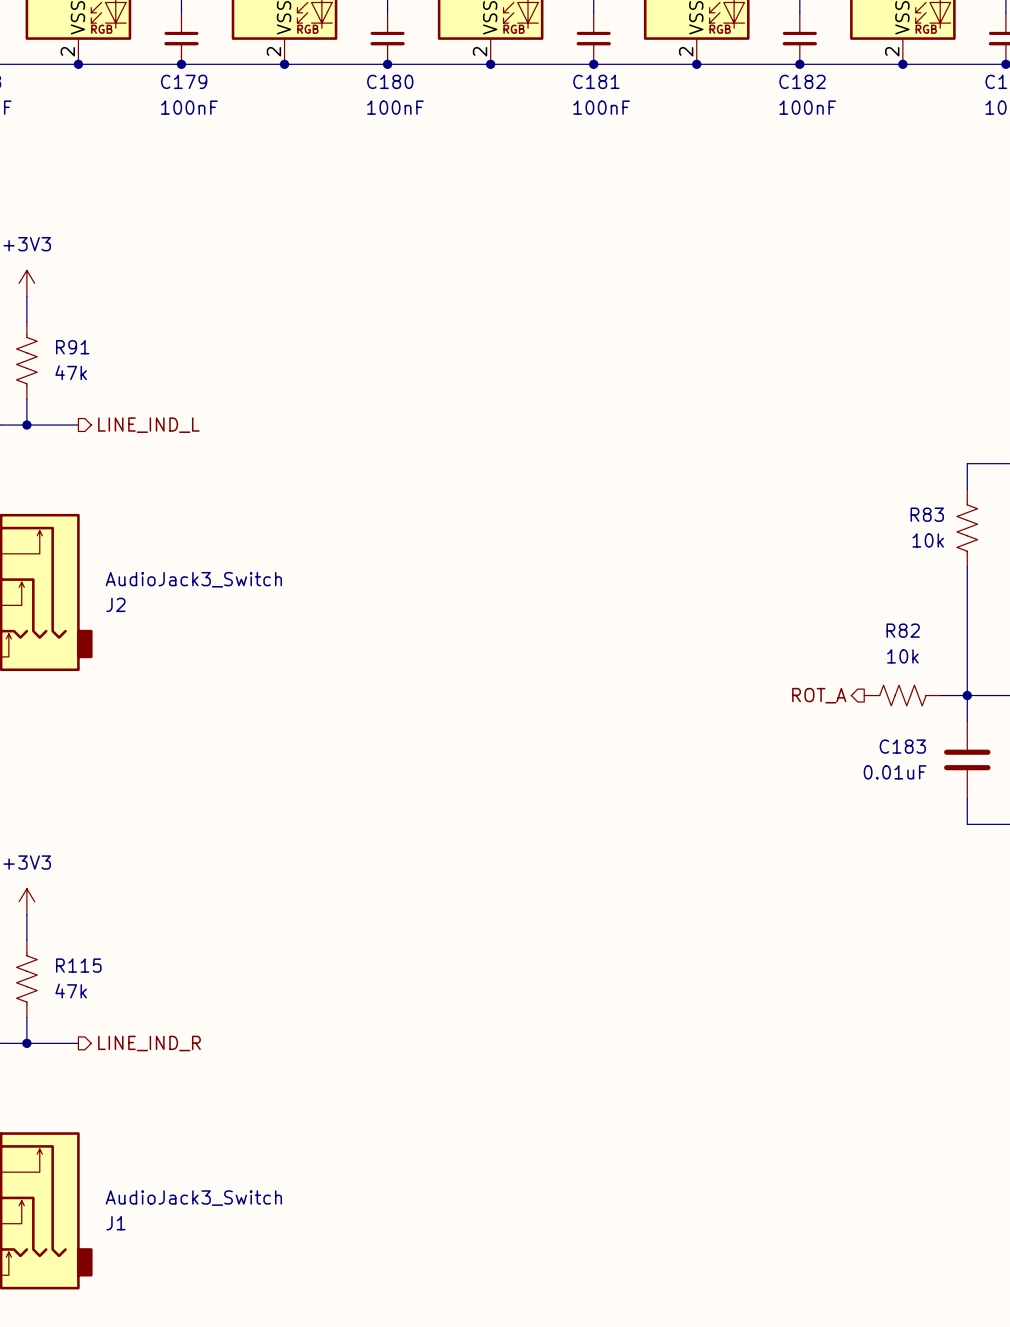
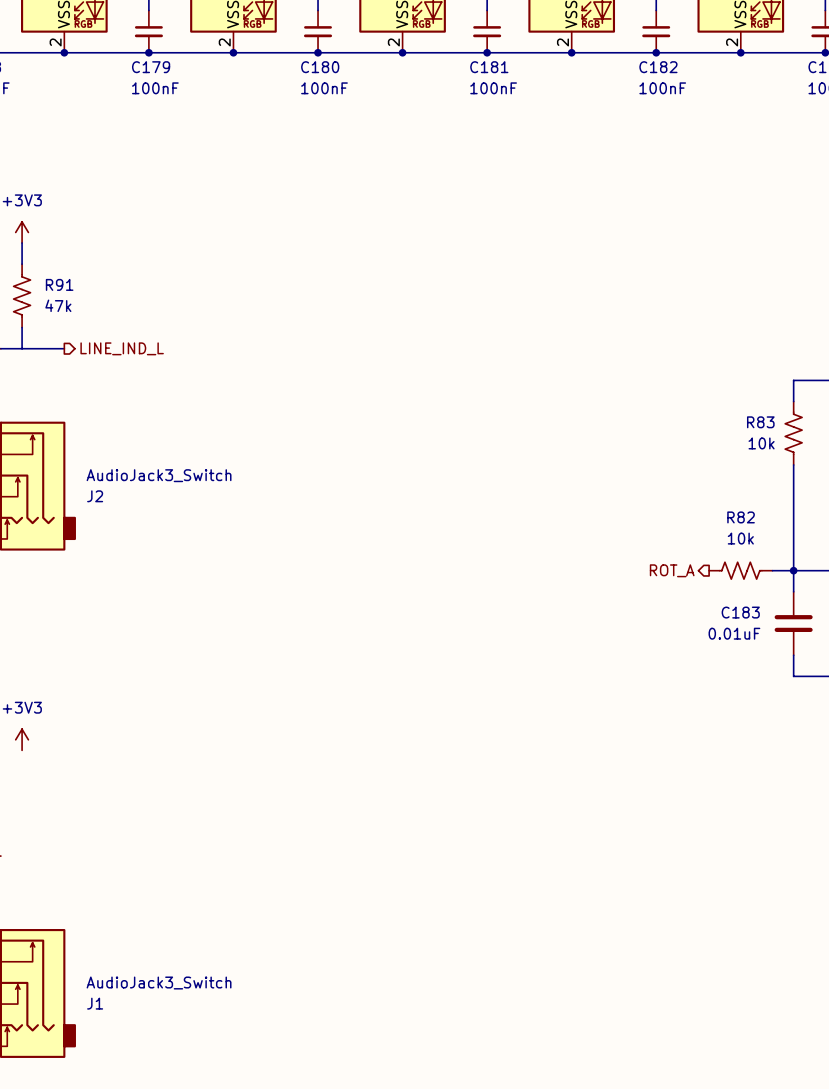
junction: (26, 425) -> none
wire: (26, 914) (26, 940) -> none
R115: 47k (26, 978) -> none
wire: (26, 1017) (26, 1043) -> none
wire: (1, 1043) (78, 1043) -> none
junction: (26, 1043) -> none
hierarchical label: LINE_IND_R (149, 1043) -> none

